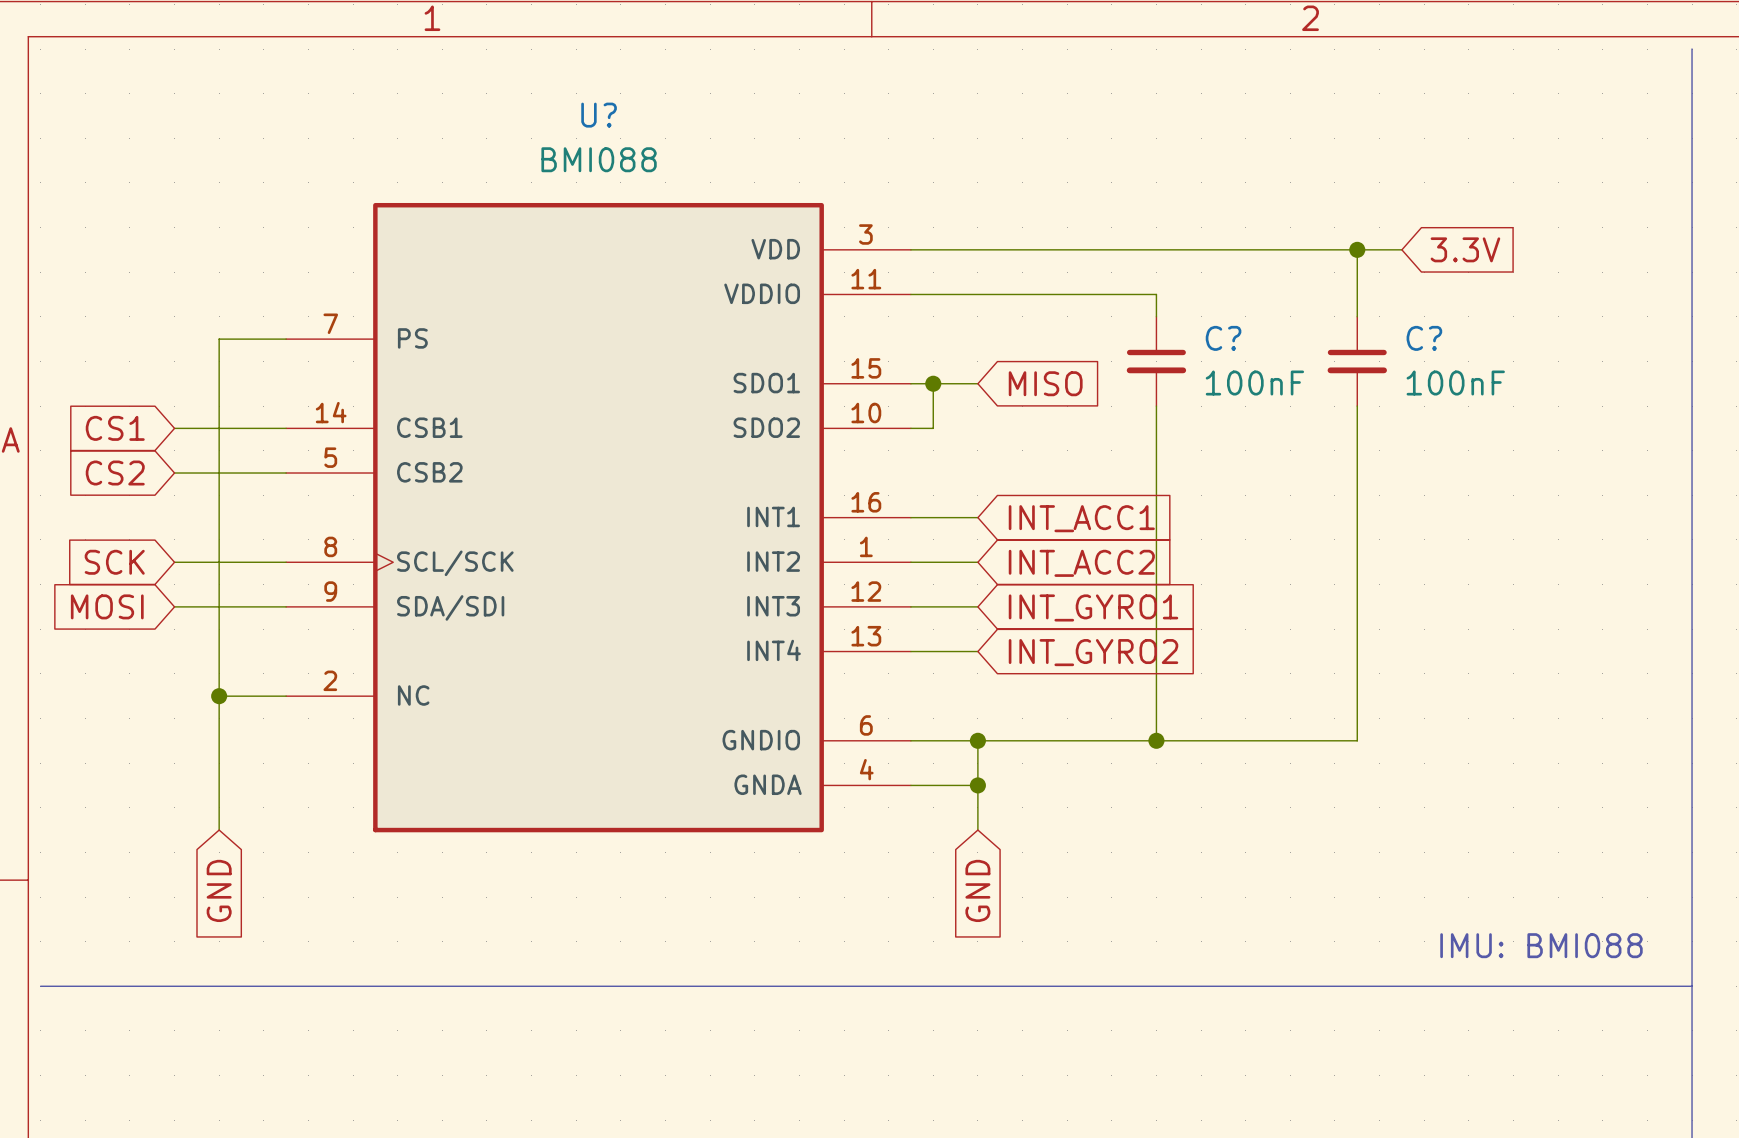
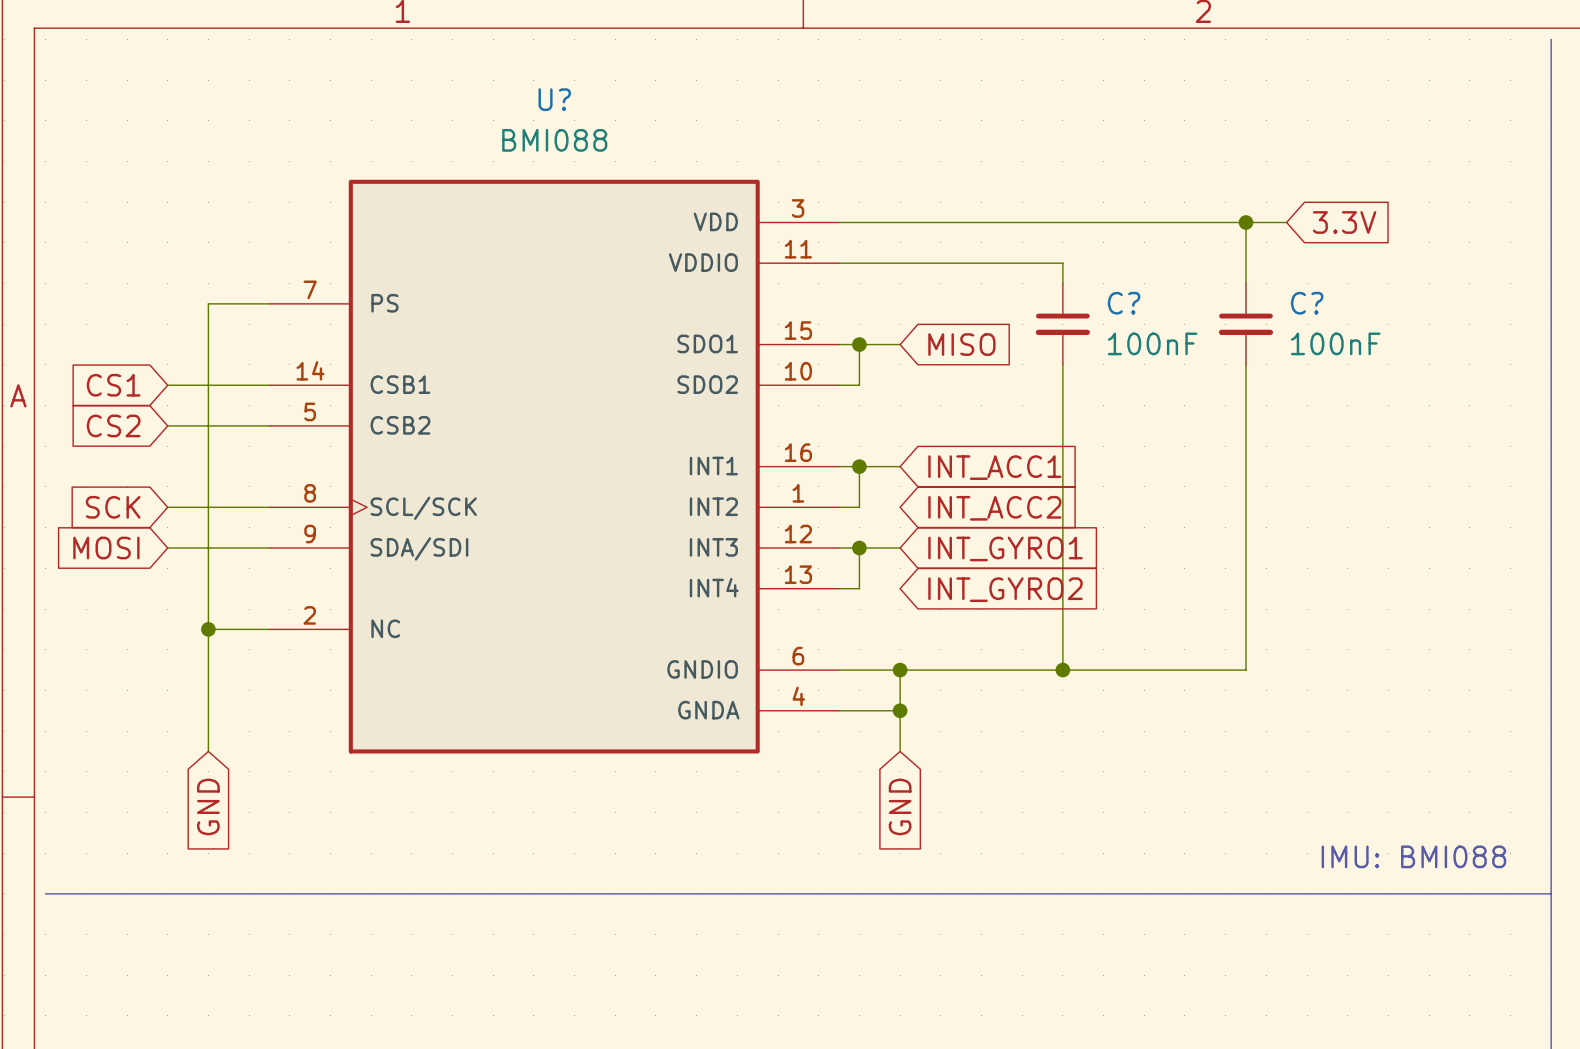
junction: none -> (859, 466)
wire: (933, 562) (977, 562) -> (859, 507) (859, 466)
junction: none -> (859, 548)
wire: (933, 651) (977, 651) -> (859, 588) (859, 548)

